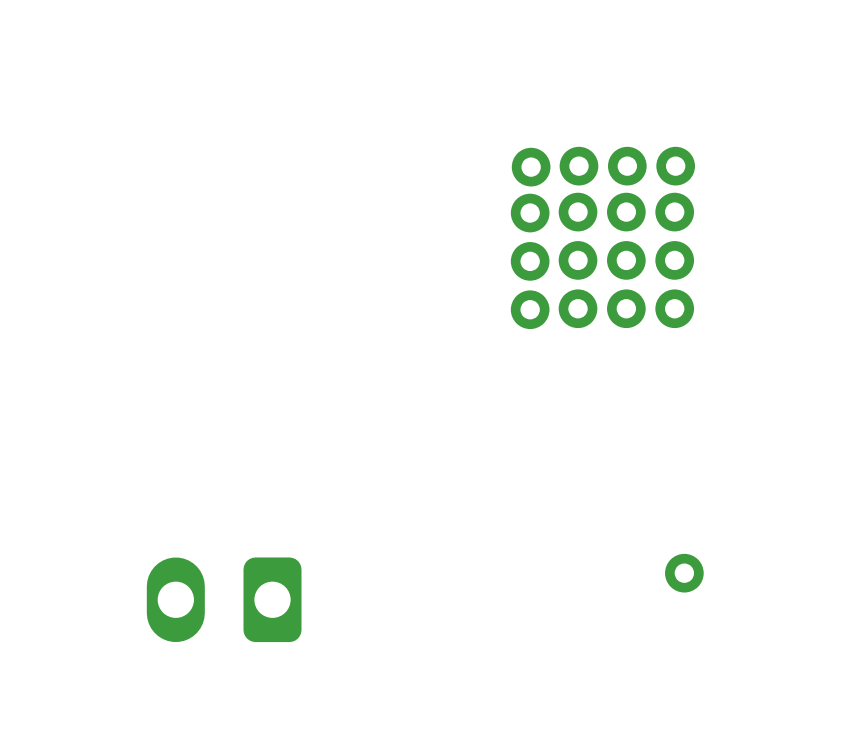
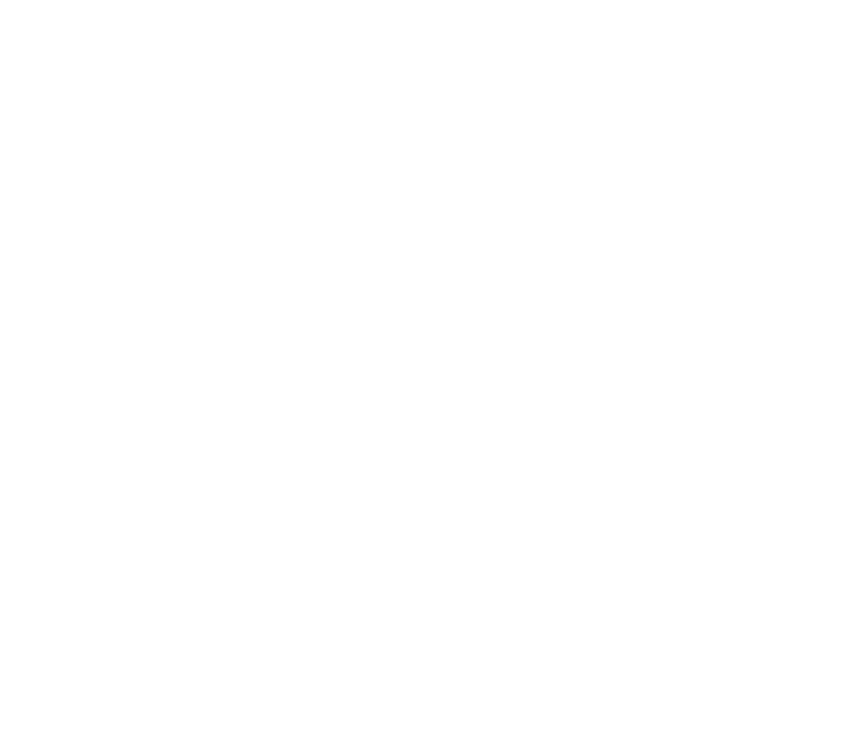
via: (578, 166) -> none
via: (627, 166) -> none
via: (675, 166) -> none
via: (531, 167) -> none
via: (578, 212) -> none
via: (626, 212) -> none
via: (674, 212) -> none
via: (530, 213) -> none
via: (578, 260) -> none
via: (626, 260) -> none
via: (674, 260) -> none
via: (530, 261) -> none
via: (578, 308) -> none
via: (626, 308) -> none
via: (674, 308) -> none
via: (530, 309) -> none
via: (684, 573) -> none
part: (224, 599) -> none

